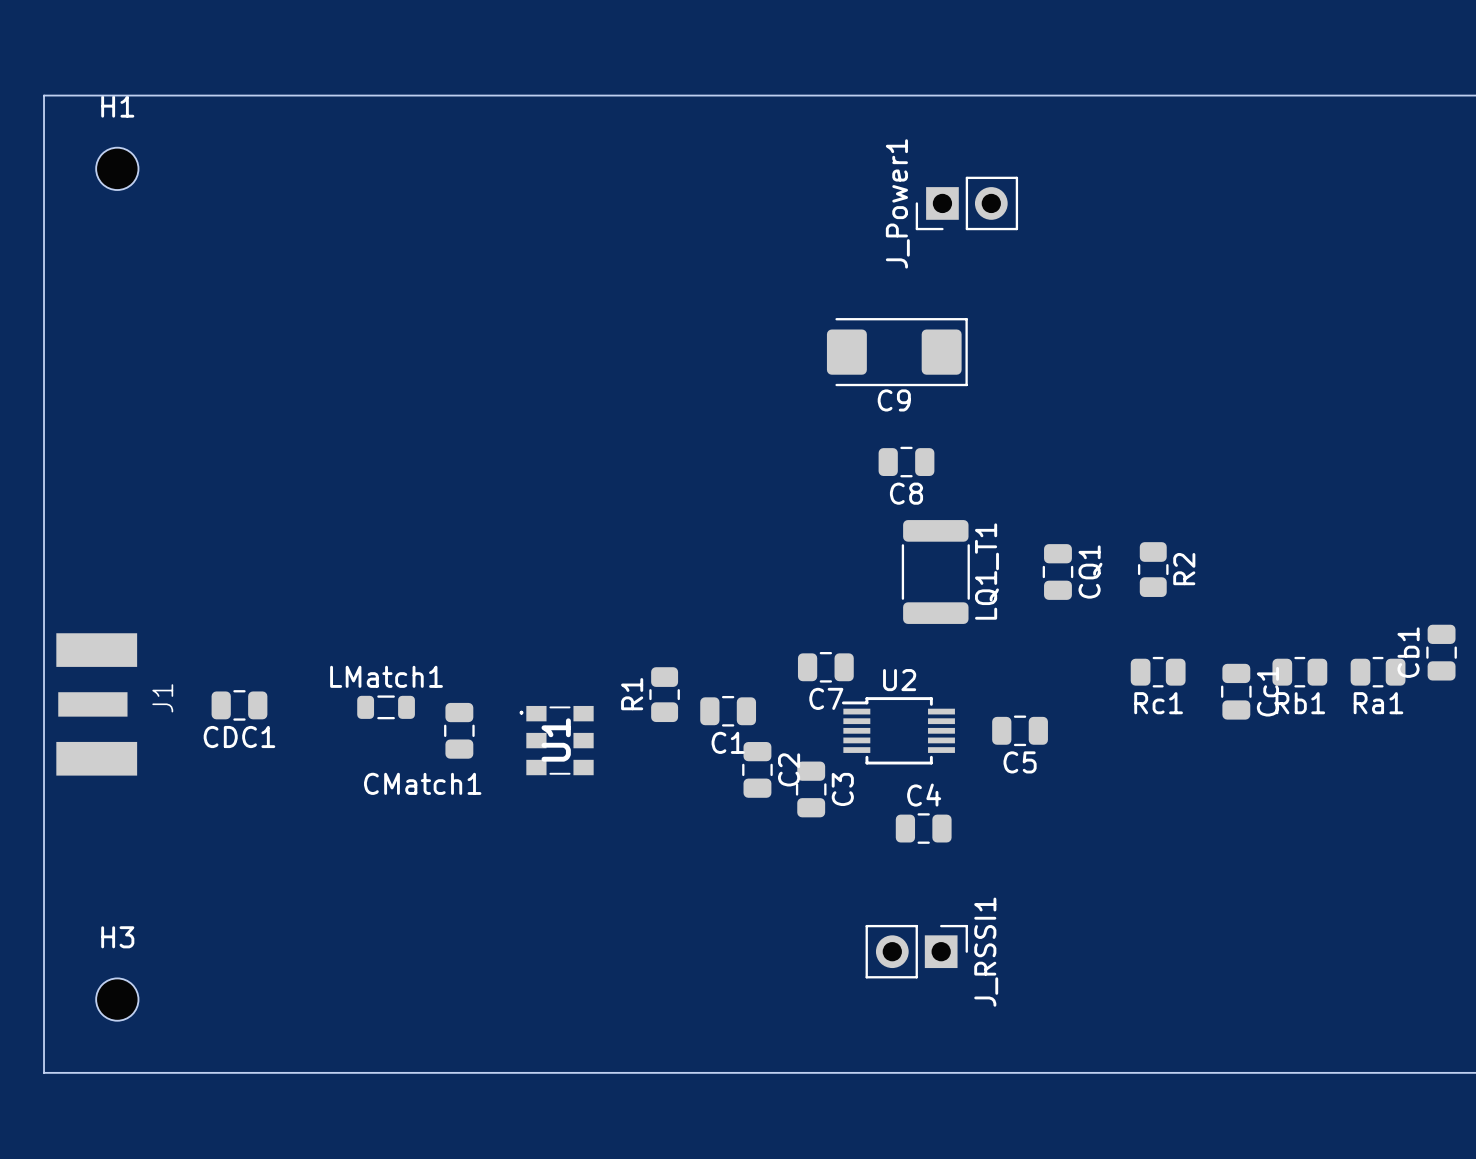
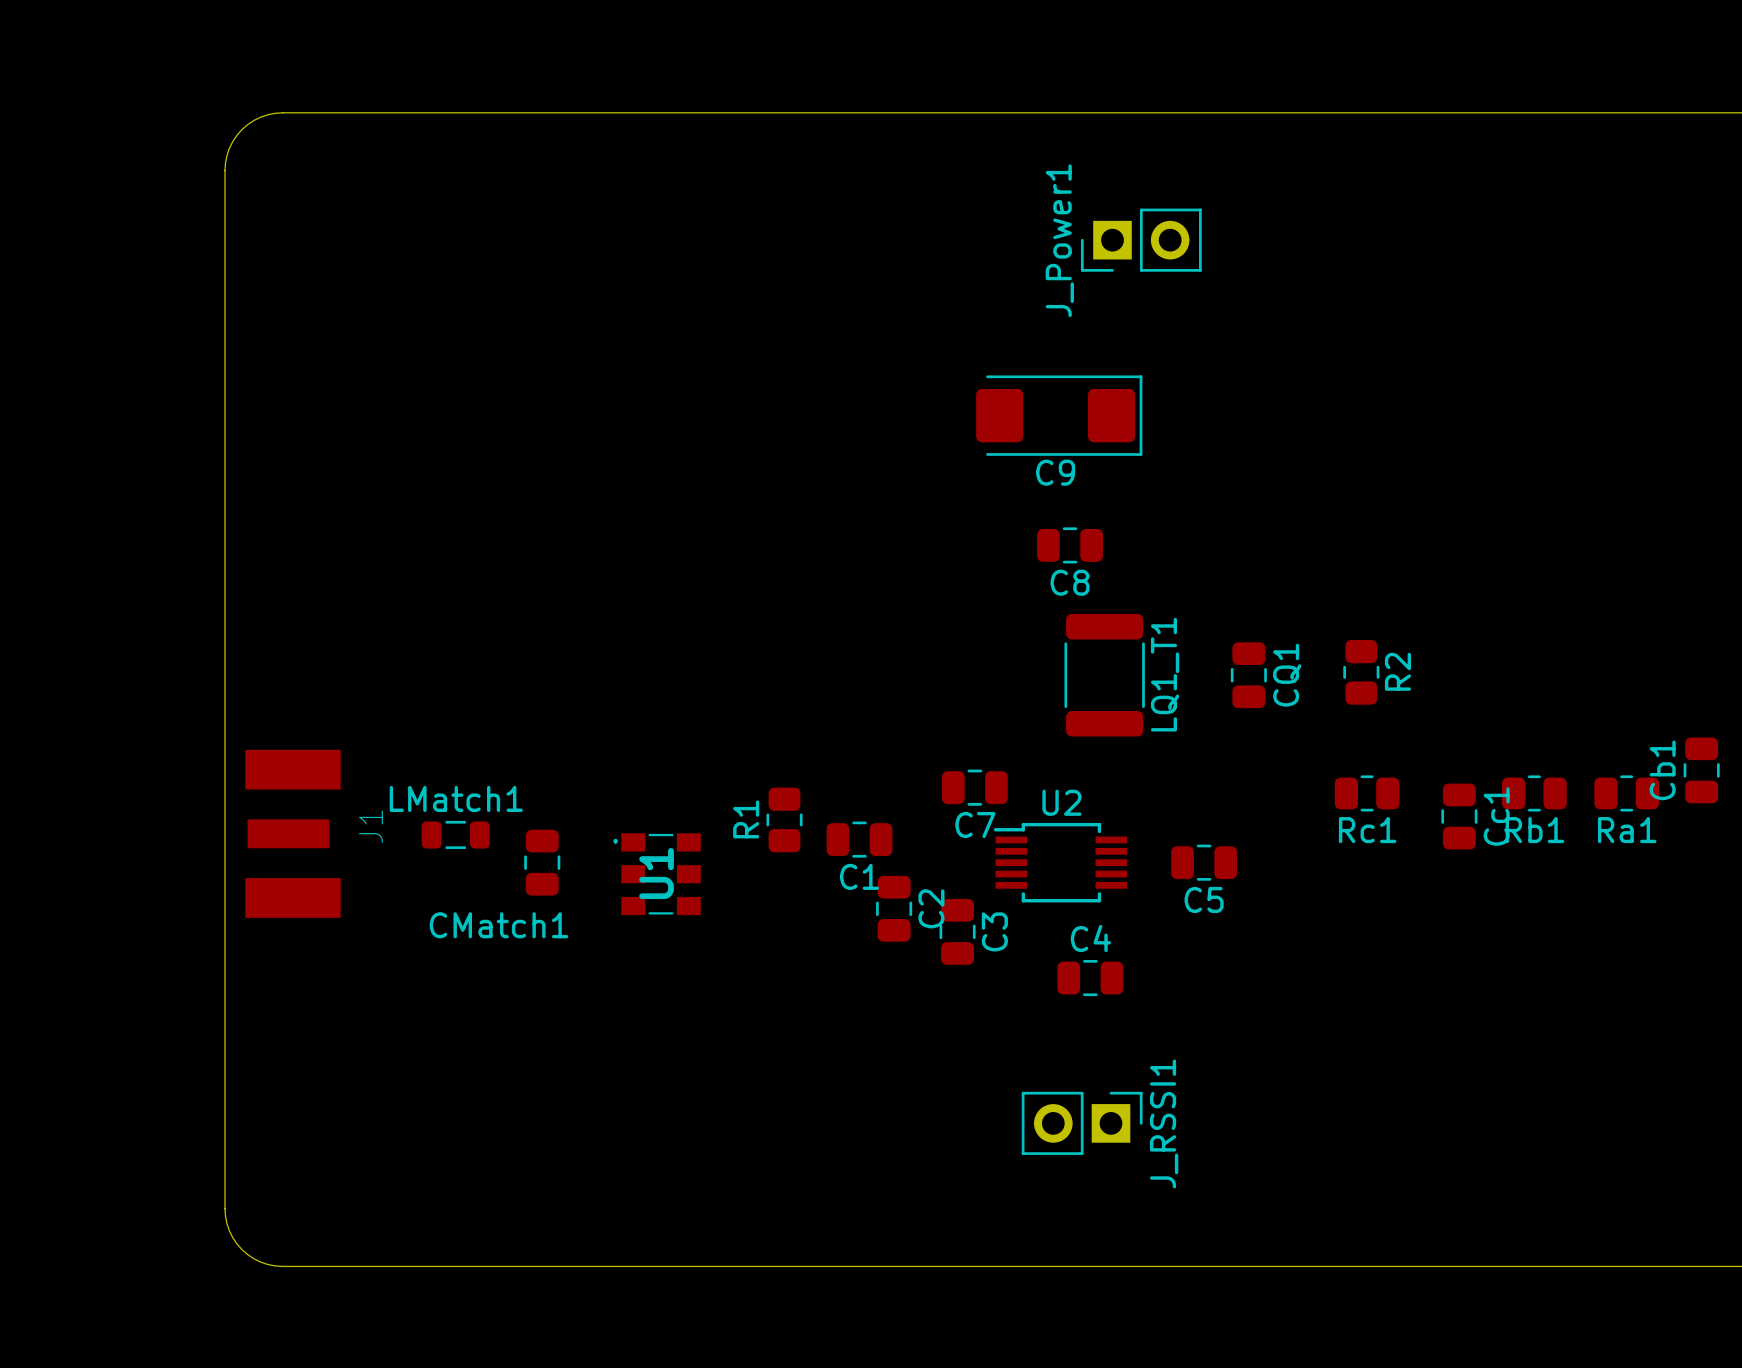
board edge: (239, 95) (44, 95) (44, 1072) (239, 1072) -> (282, 112) (260, 117) (241, 129) (229, 148) (225, 170) (225, 1208) (229, 1230) (241, 1249) (260, 1262) (282, 1266)
H1: (117, 168) -> none
J1 position: (96, 704) -> (292, 833)
CDC1: (239, 705) -> none
H3: (117, 999) -> none

